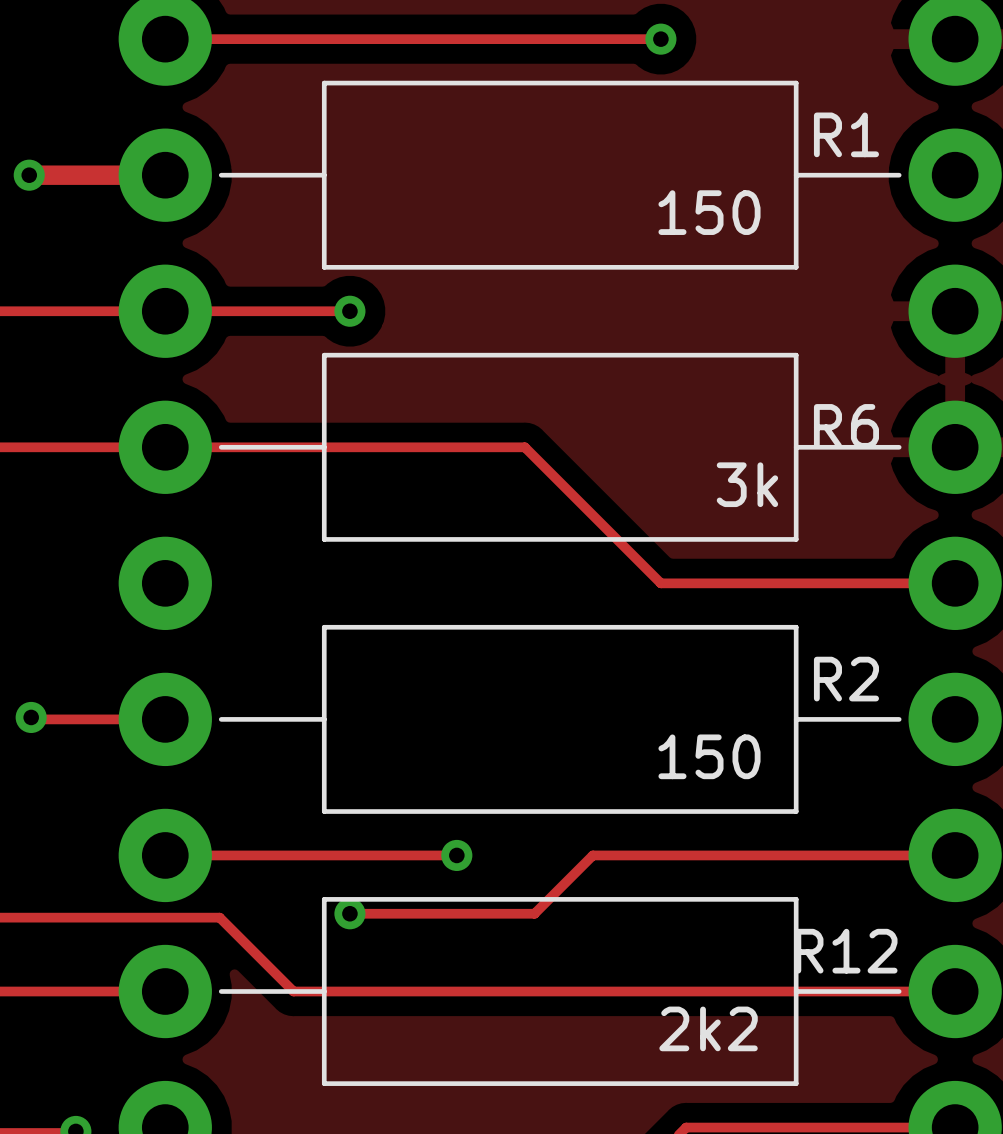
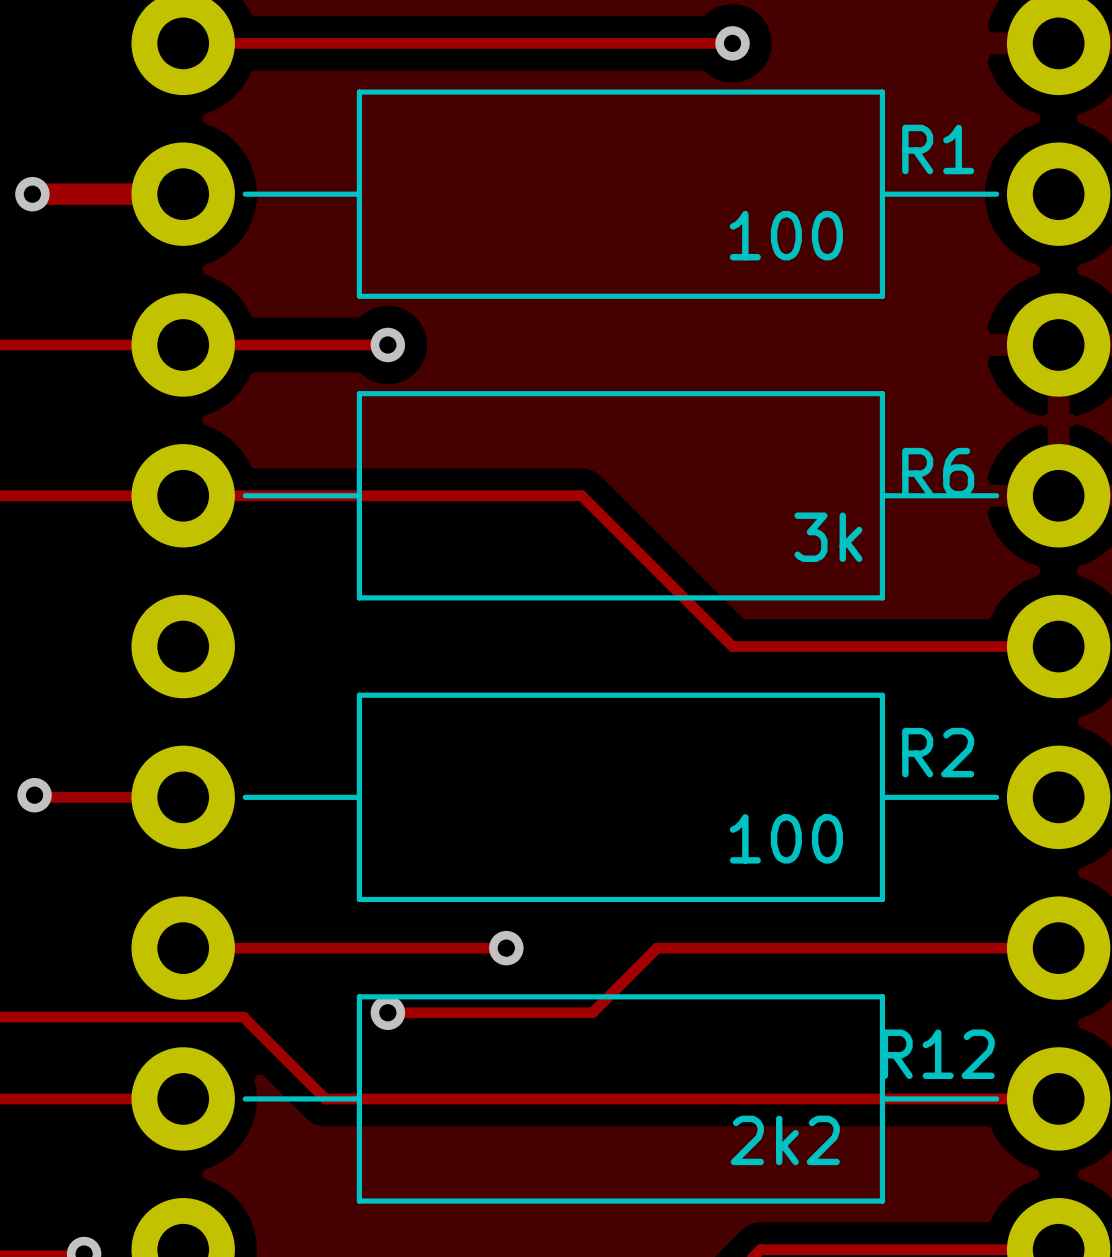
R1 value: 150 (709, 212) -> 100 (786, 235)
R2 value: 150 (709, 756) -> 100 (786, 838)

